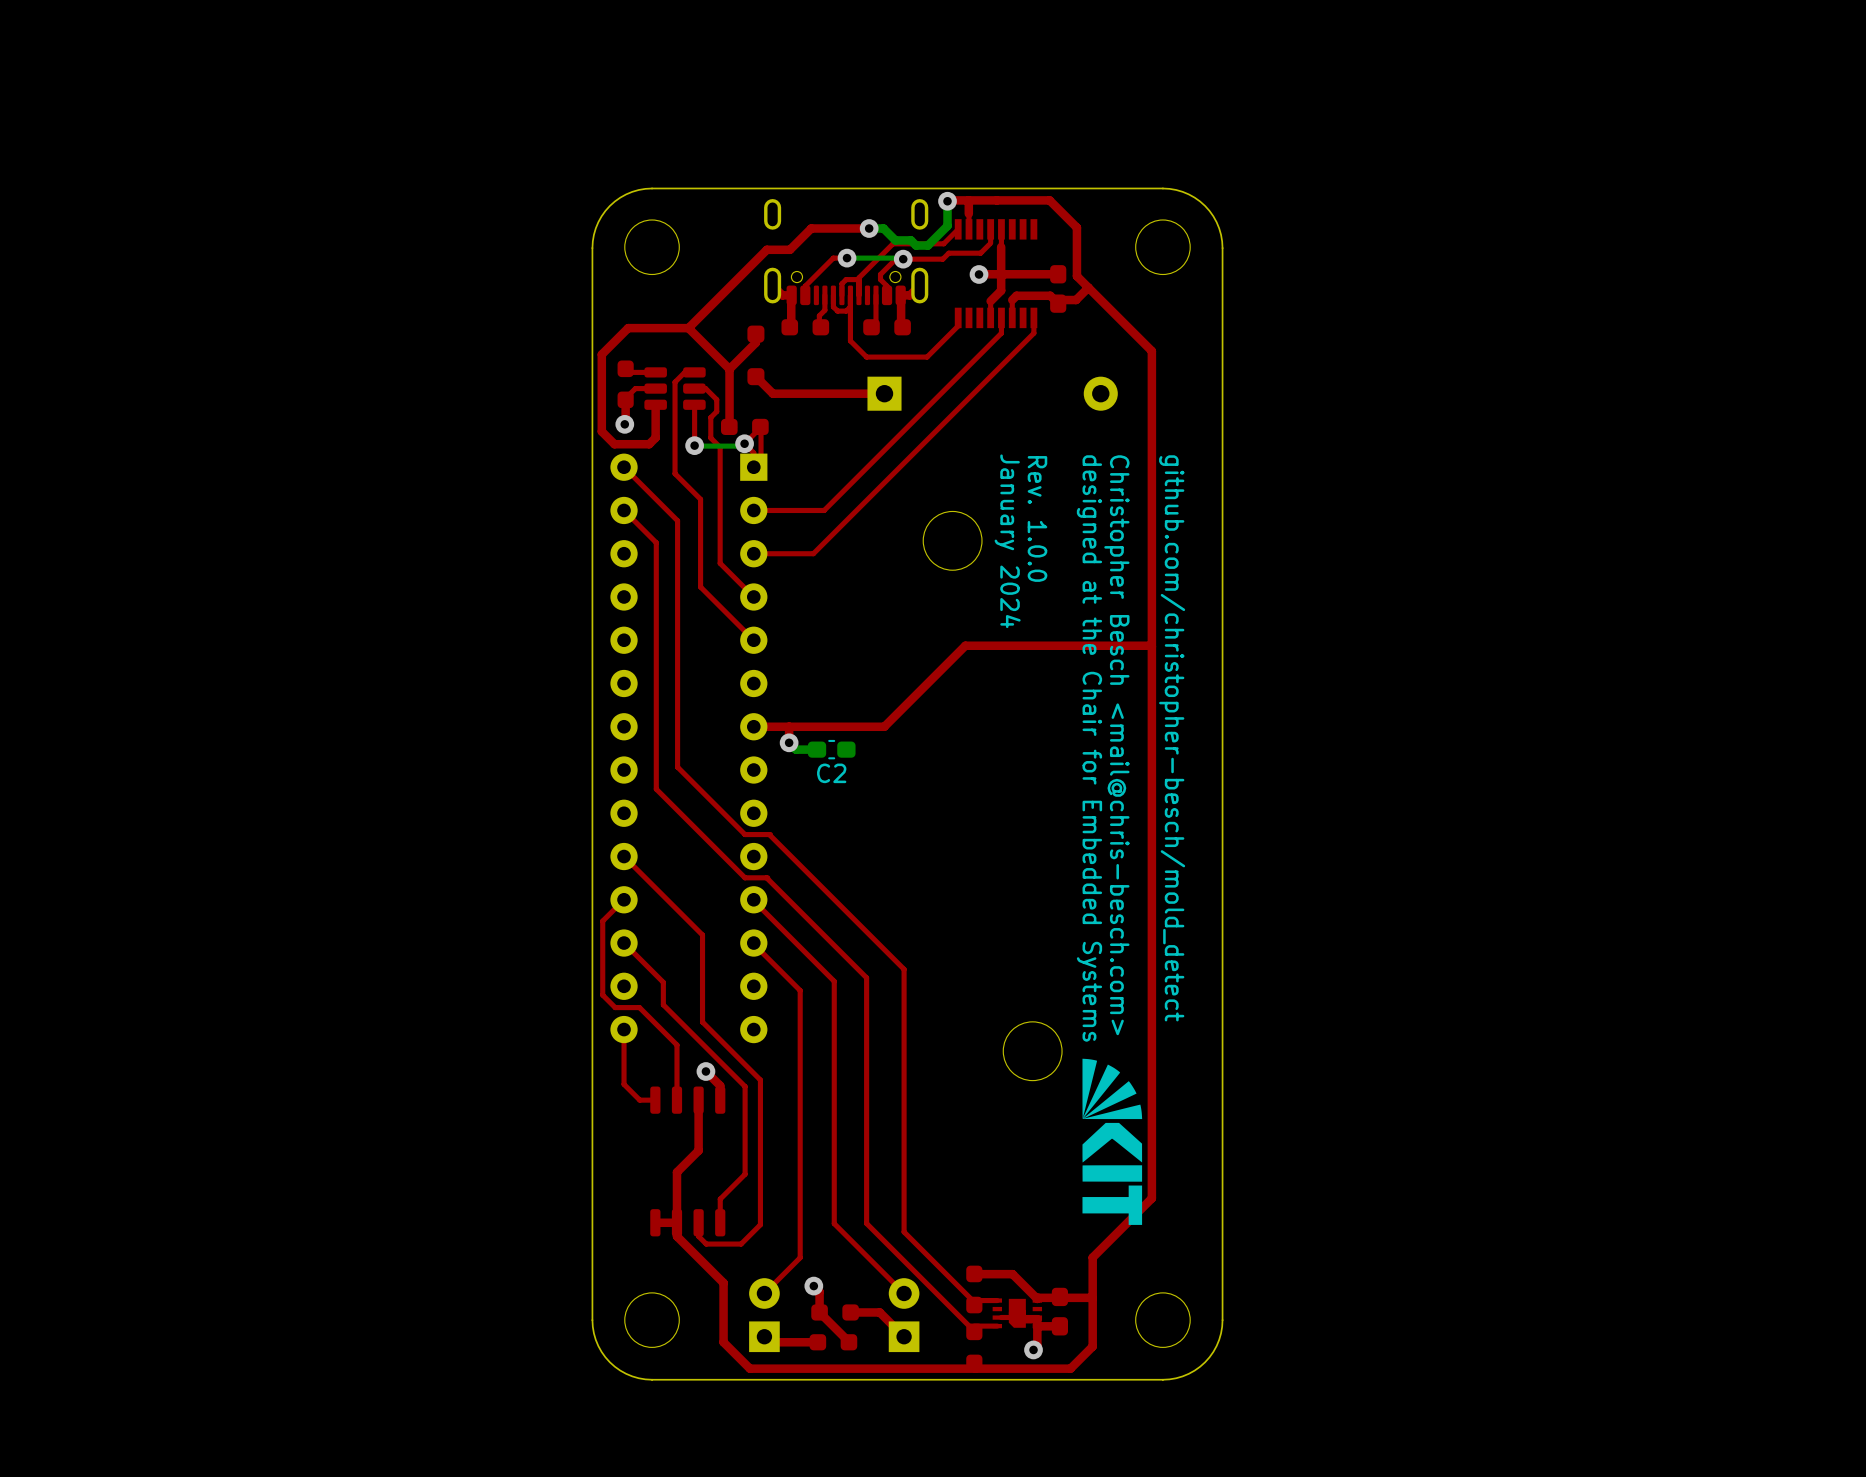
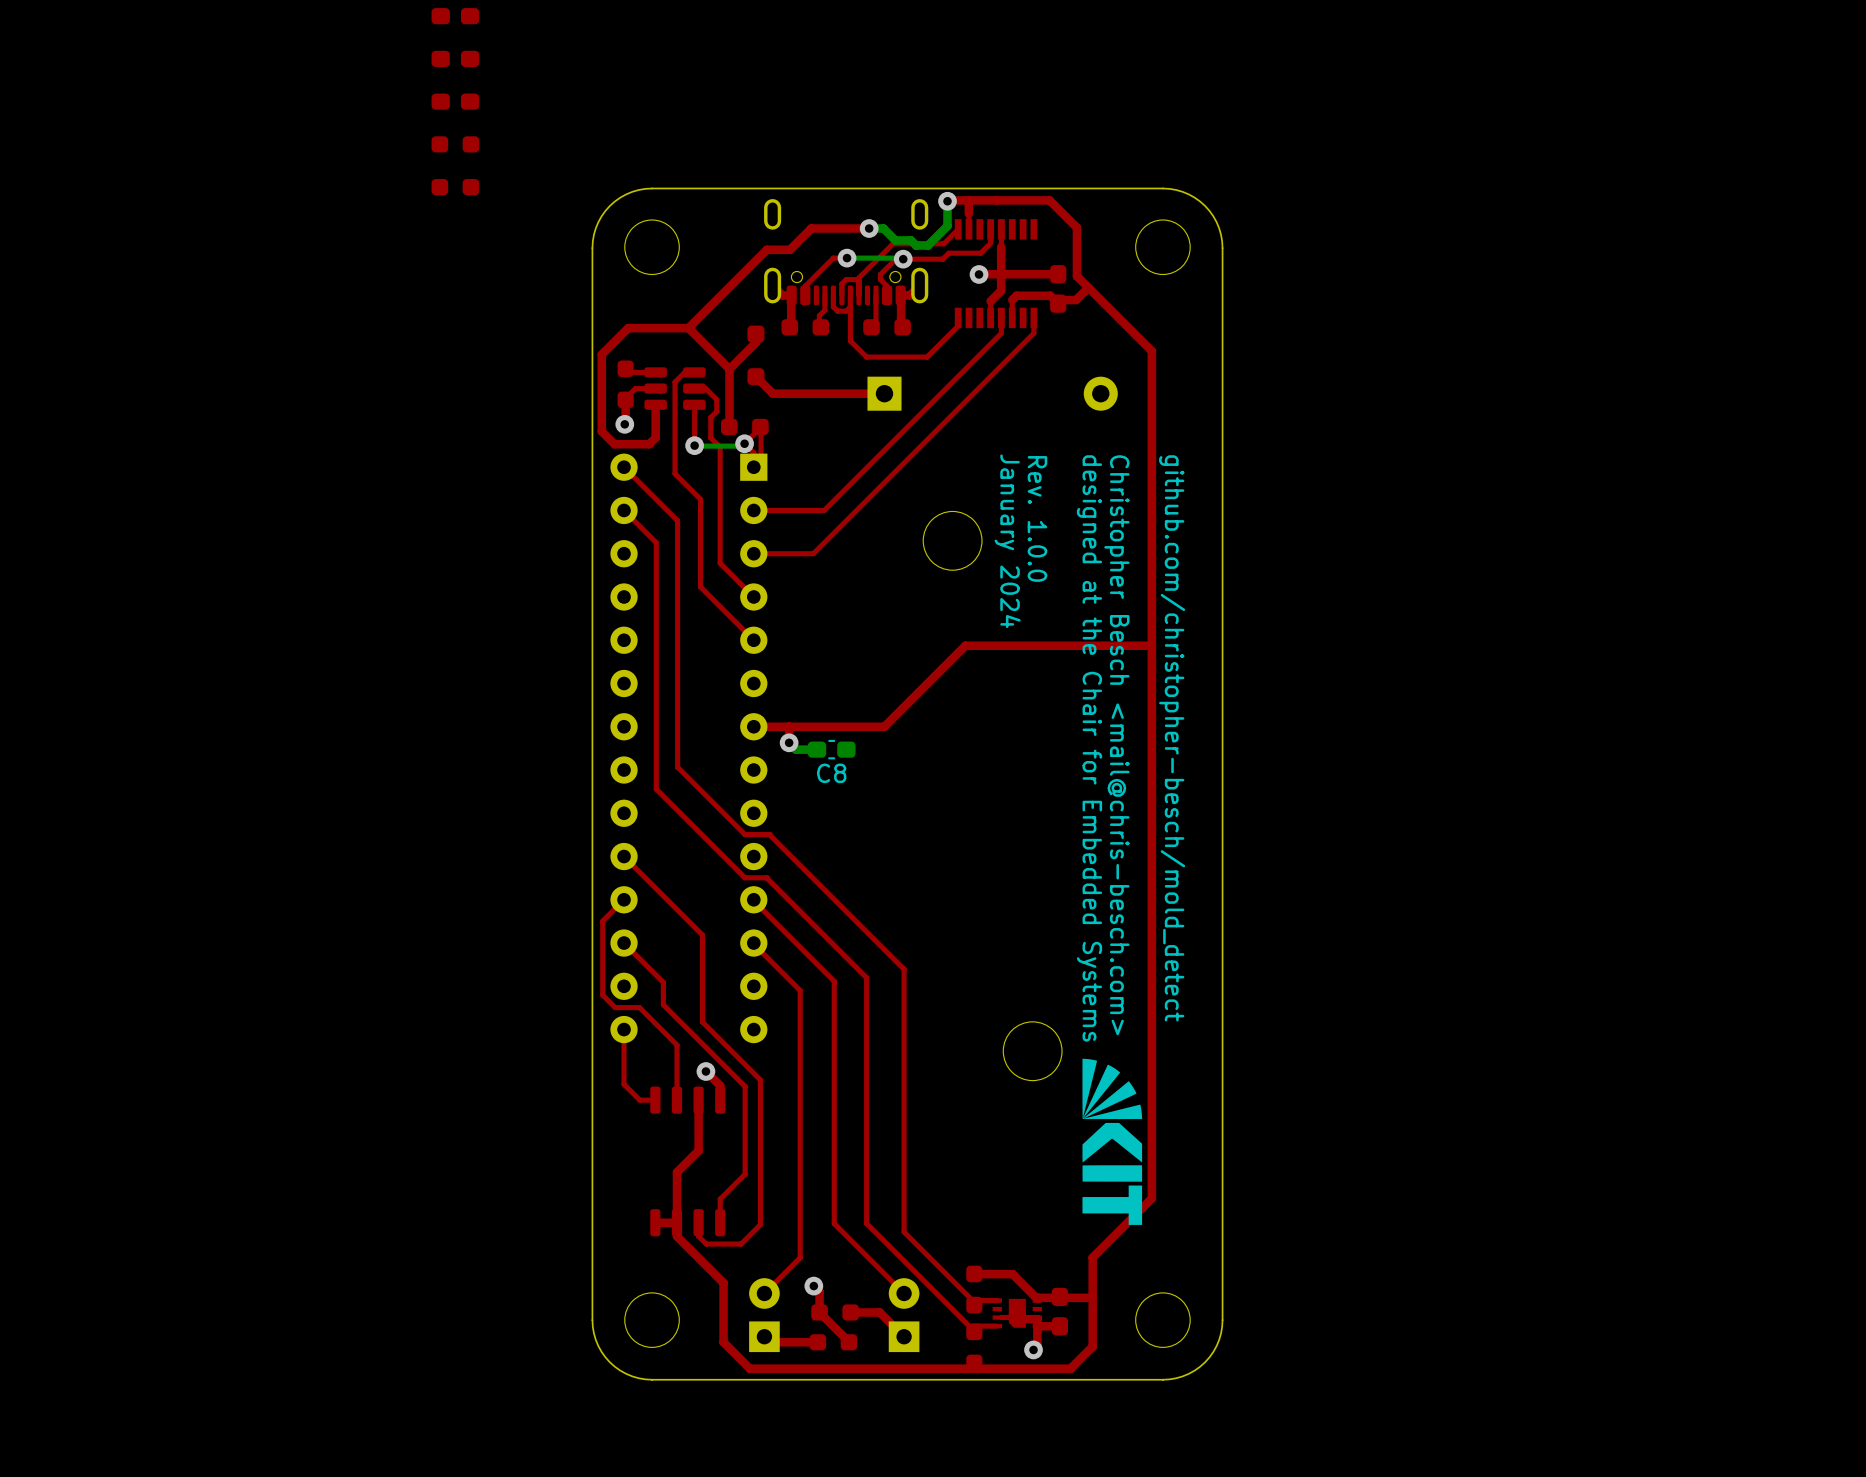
part: none -> (455, 16)
part: none -> (455, 58)
part: none -> (455, 101)
part: none -> (455, 144)
part: none -> (455, 187)
C2 name: C2 (831, 773) -> C8 (831, 773)

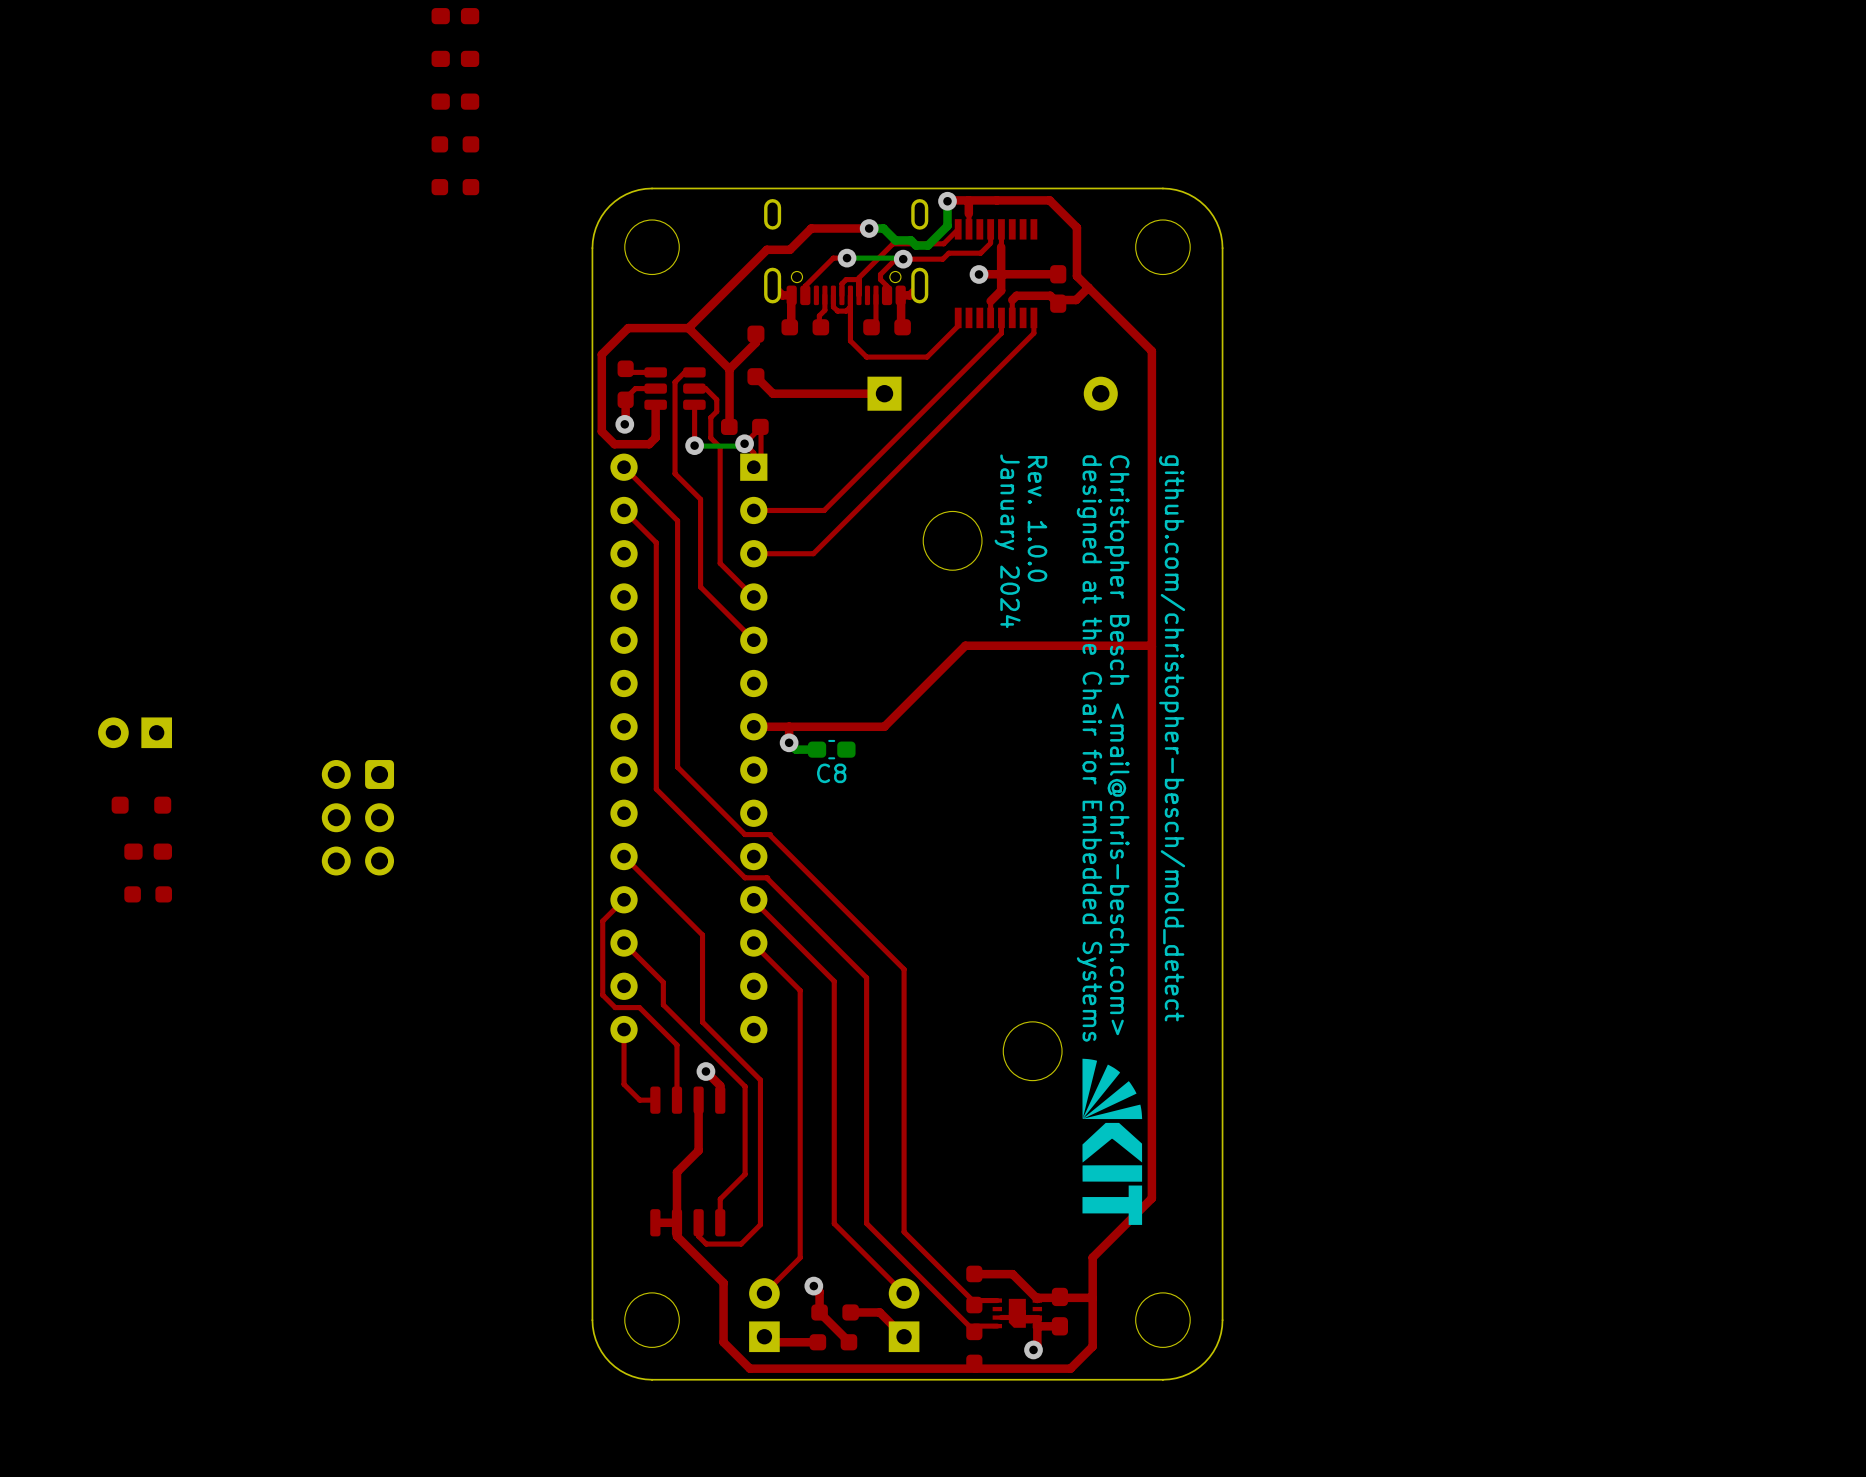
part: none -> (135, 732)
part: none -> (141, 805)
part: none -> (357, 817)
part: none -> (148, 851)
part: none -> (148, 894)

